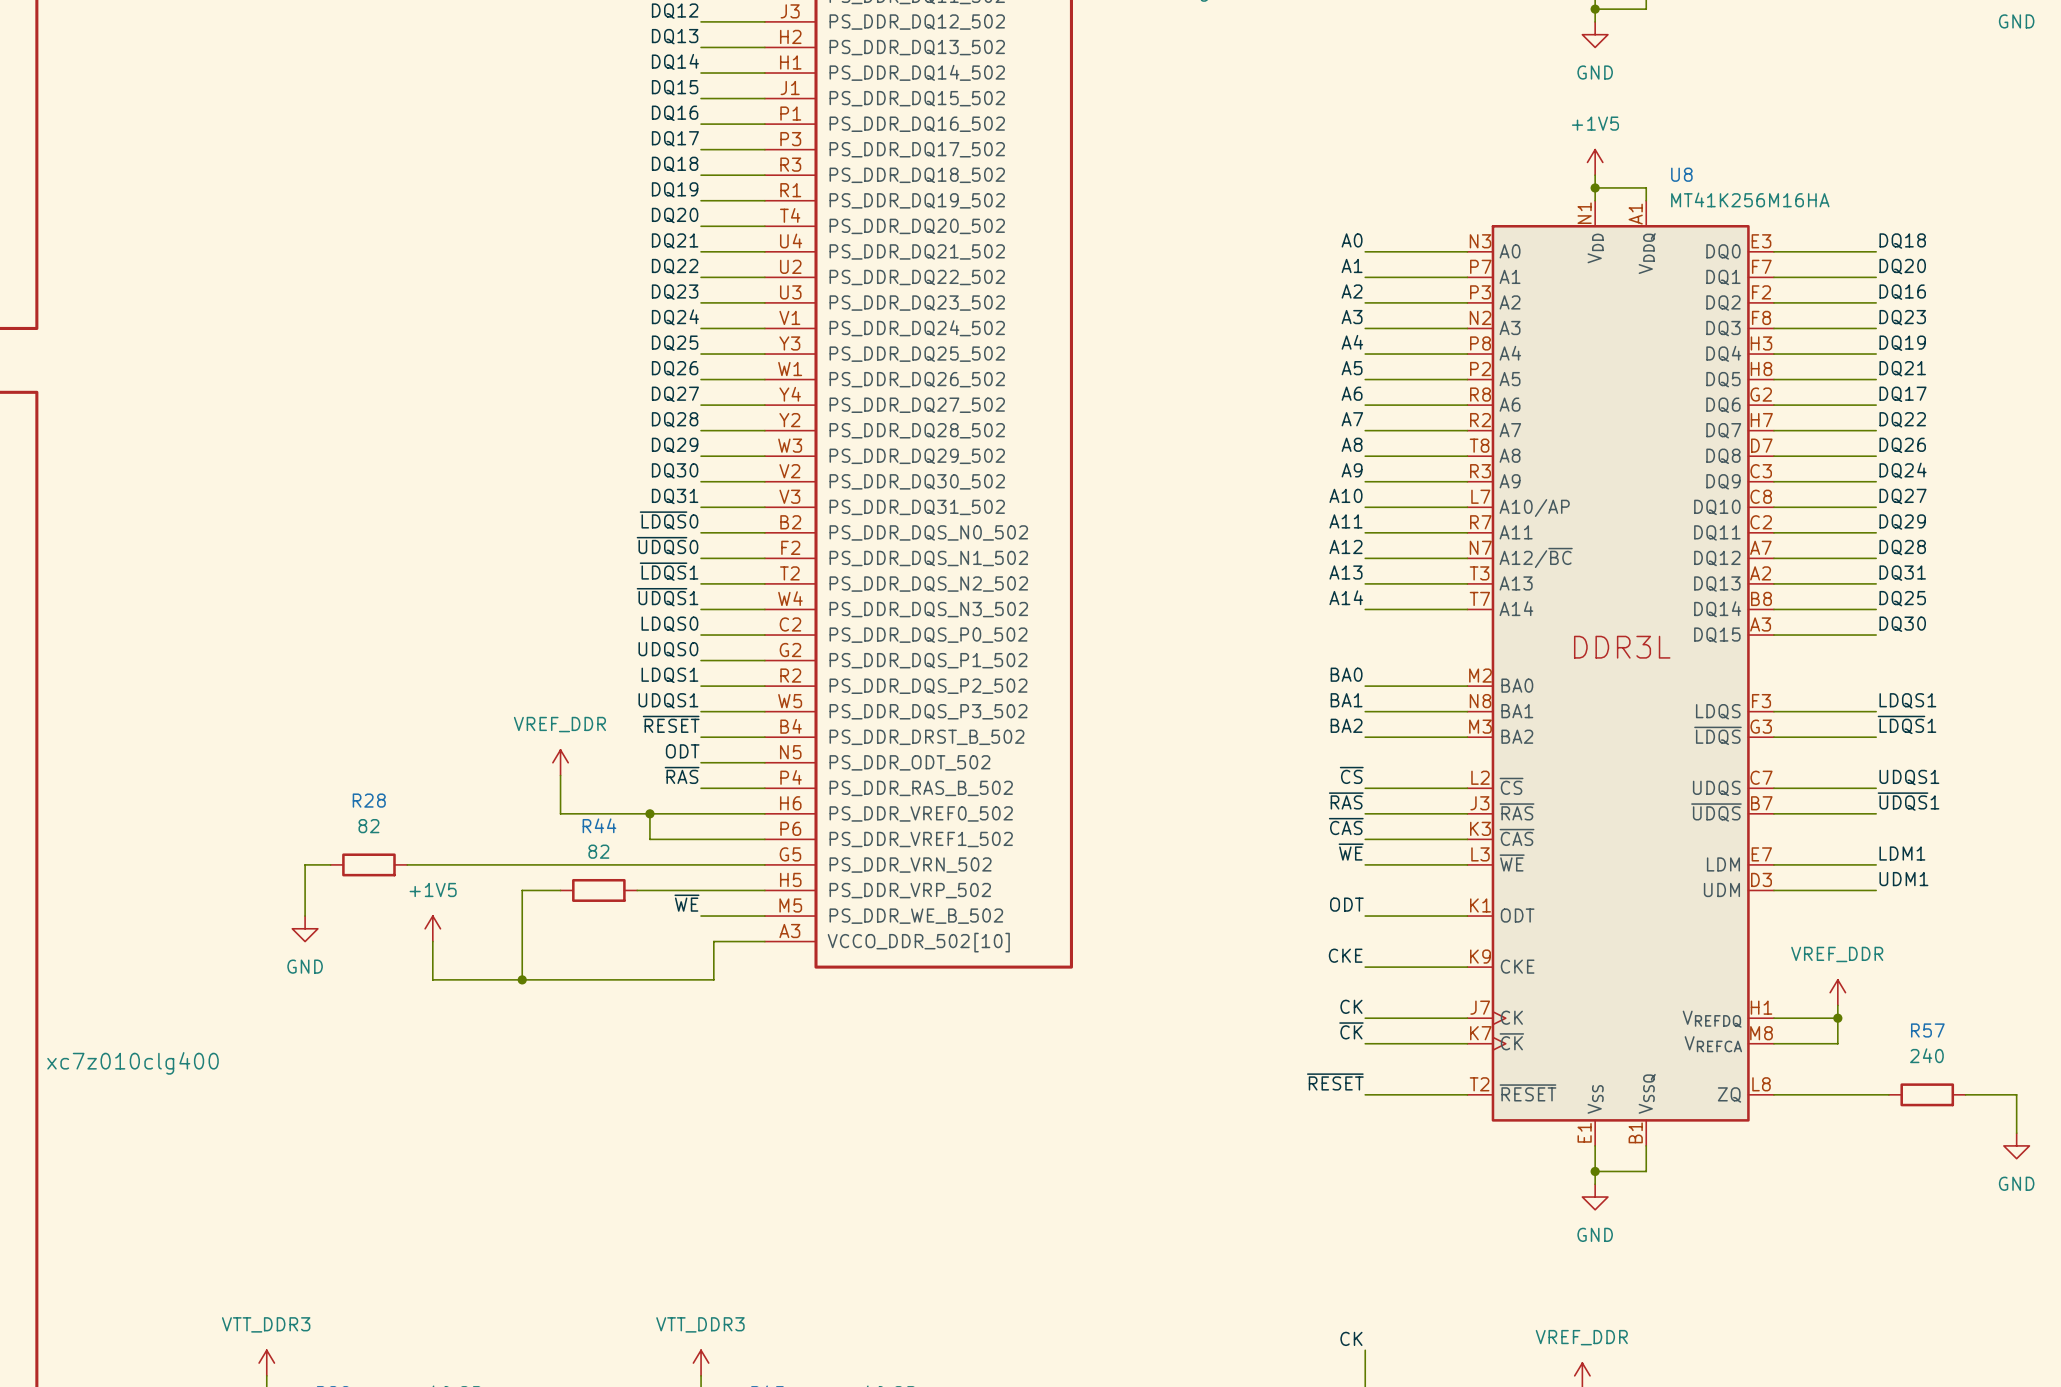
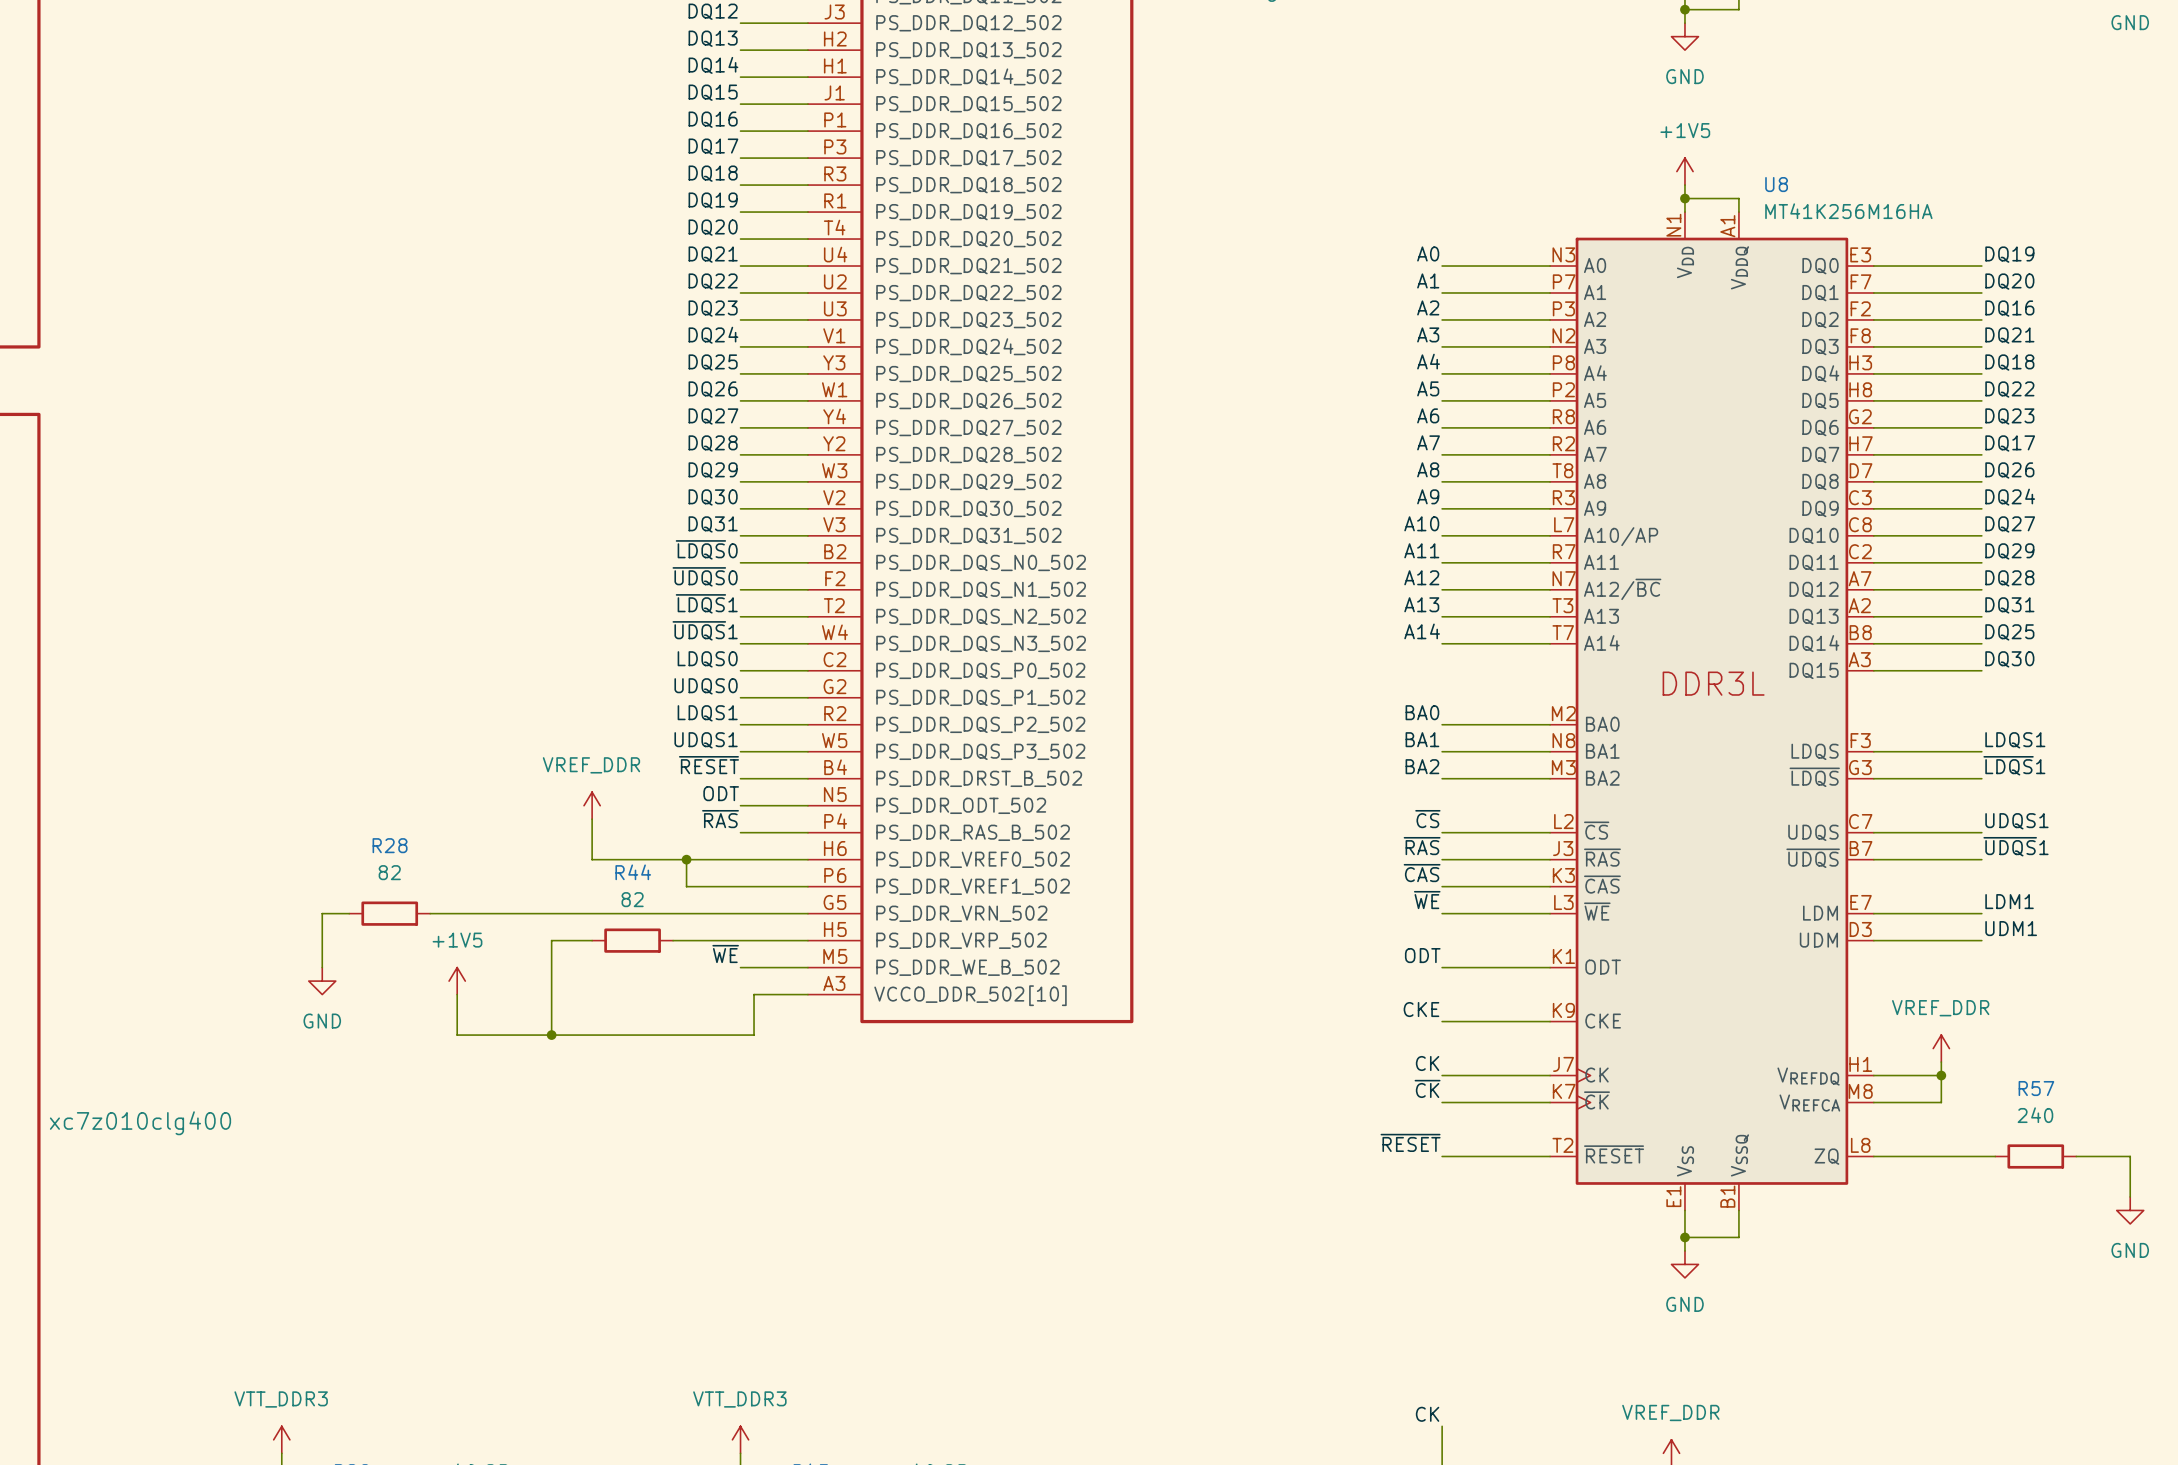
label: DQ18 (1902, 241) -> DQ19 (2009, 254)
label: DQ23 (1902, 317) -> DQ21 (2009, 335)
label: DQ19 (1902, 343) -> DQ18 (2009, 362)
label: DQ21 (1902, 368) -> DQ22 (2009, 389)
label: DQ17 (1903, 394) -> DQ23 (2009, 416)
label: DQ22 (1902, 419) -> DQ17 (2010, 443)

